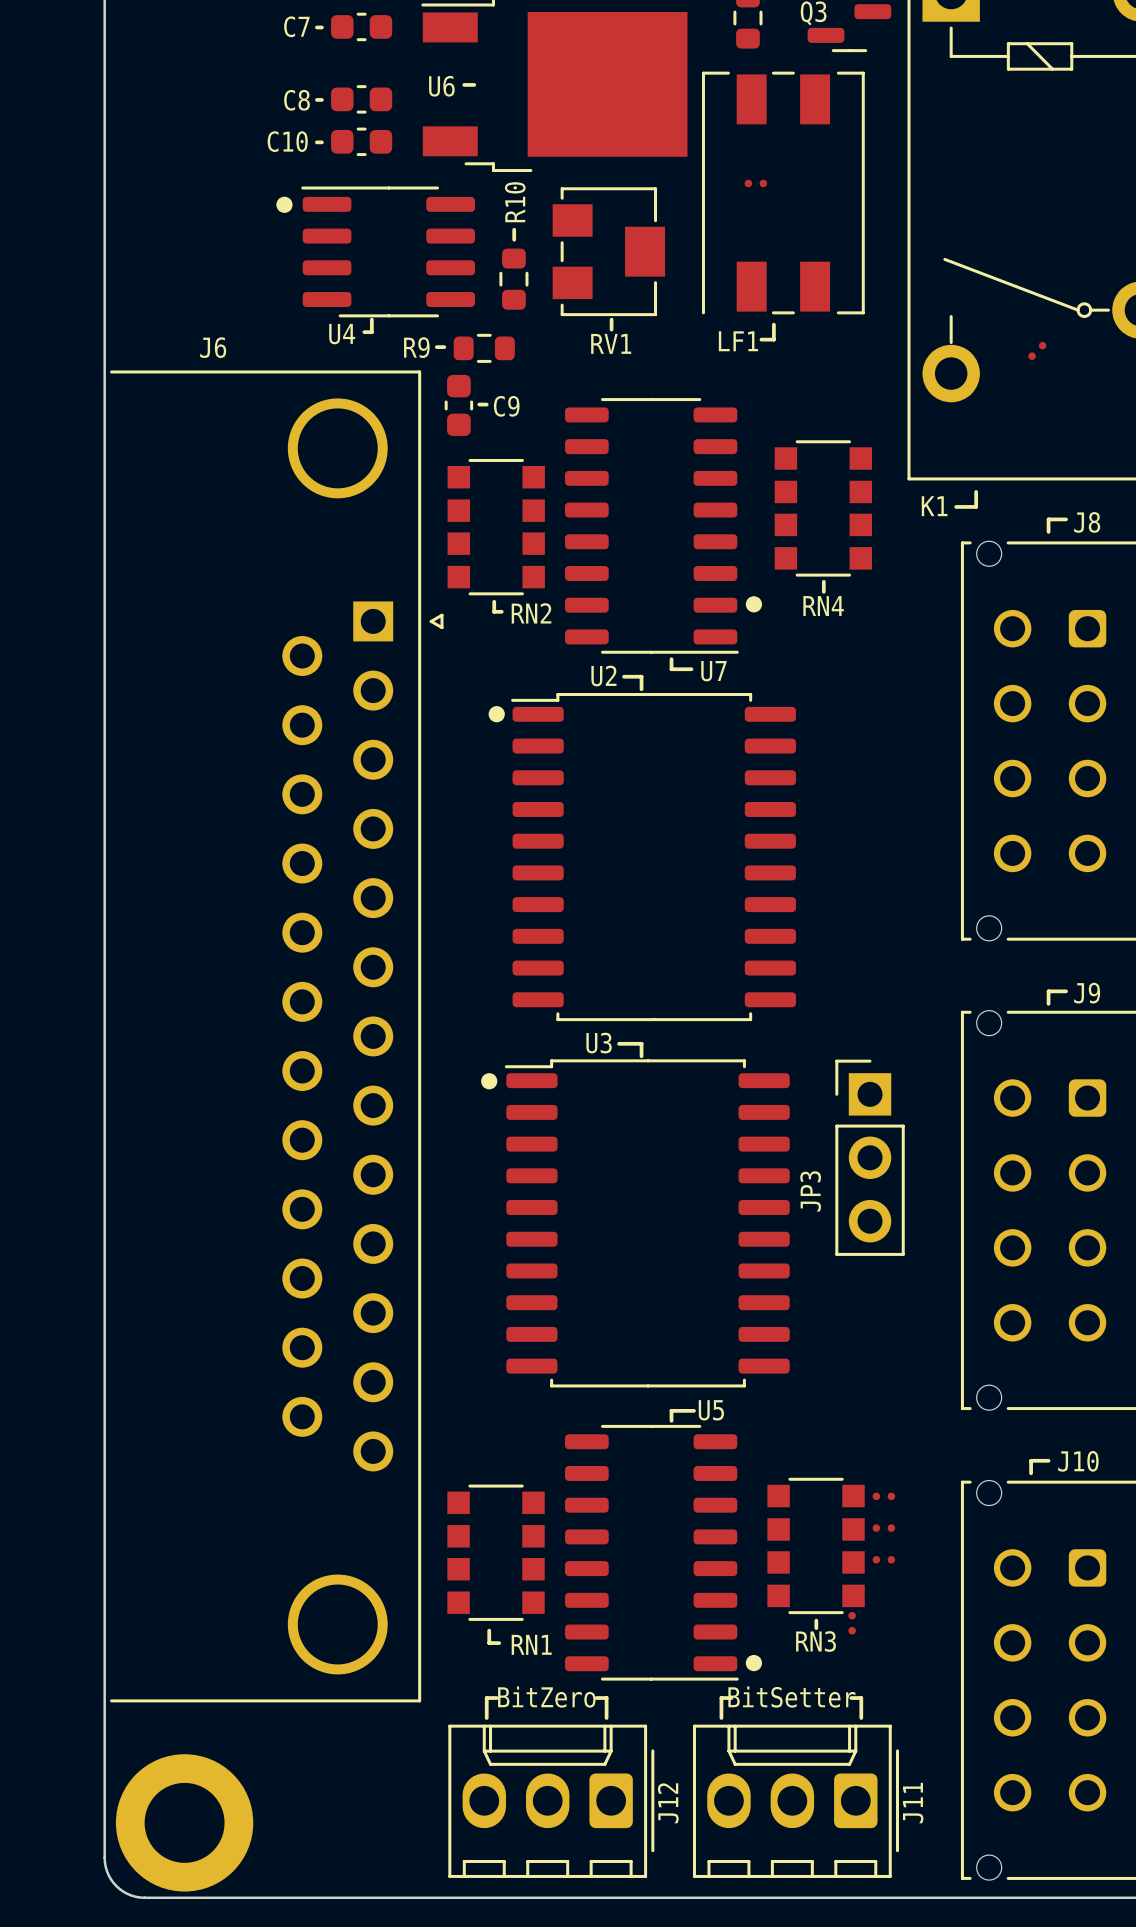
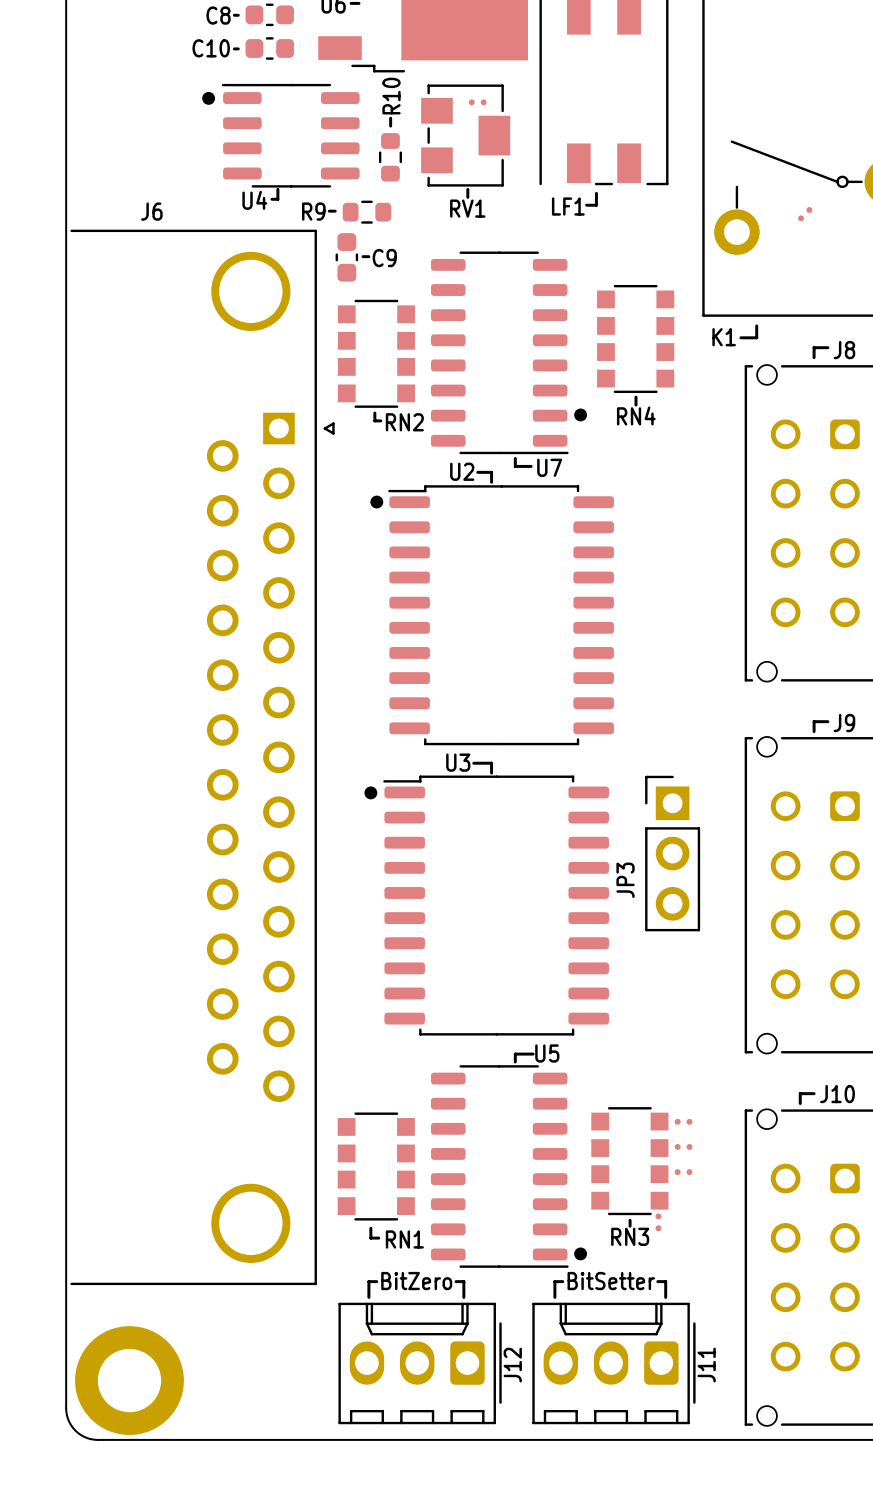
part position: (755, 183) -> (477, 102)

